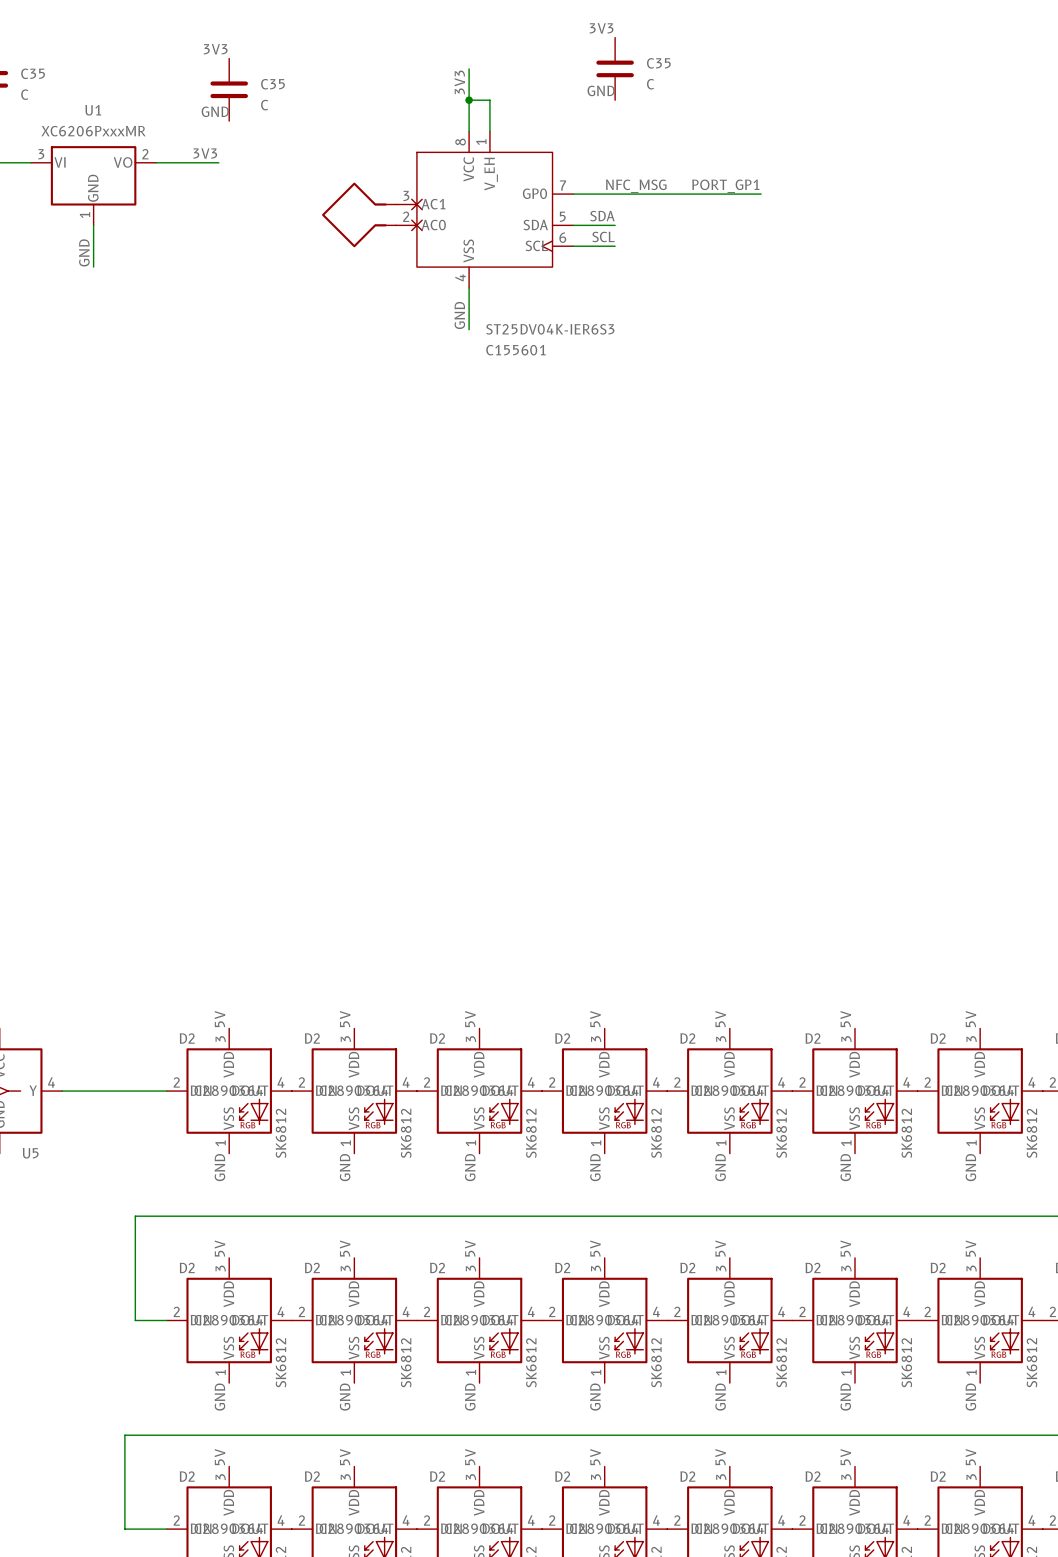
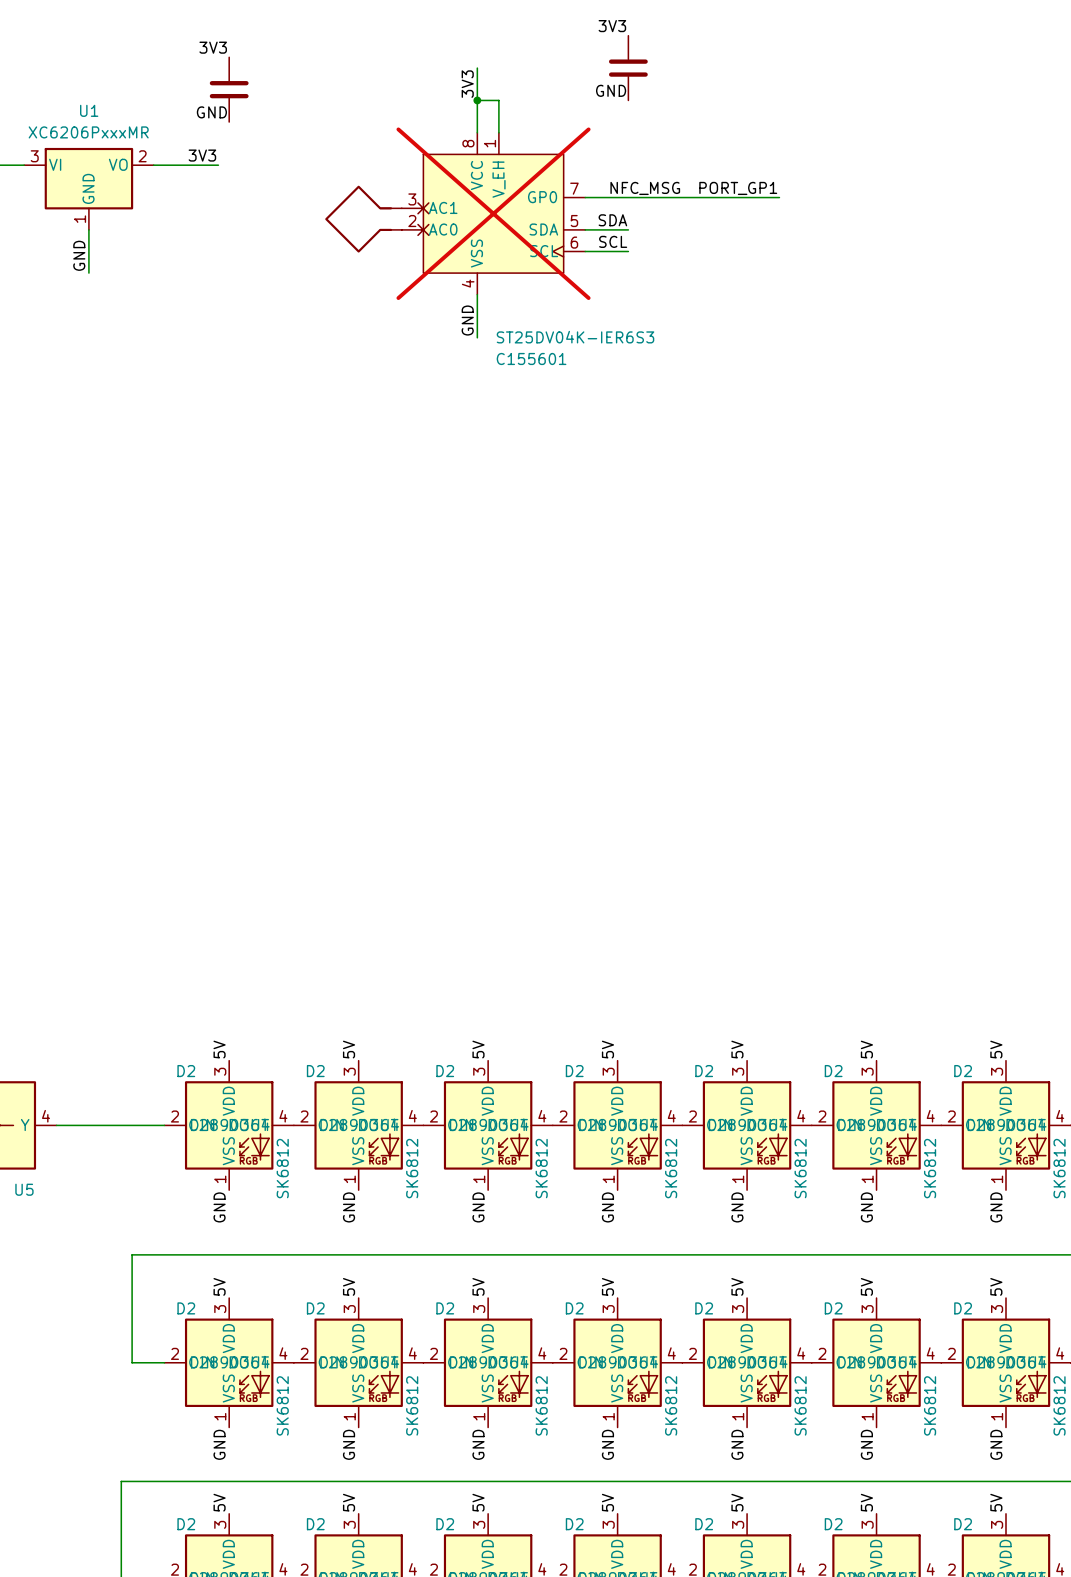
C35 name: C35 (658, 63) -> none
C35 name: C35 (33, 73) -> none
C35 name: C35 (272, 84) -> none
C35 value: C (650, 84) -> none
C35 value: C (24, 94) -> none
C35 value: C (264, 105) -> none
part do-not-place cross: none -> (493, 213)

